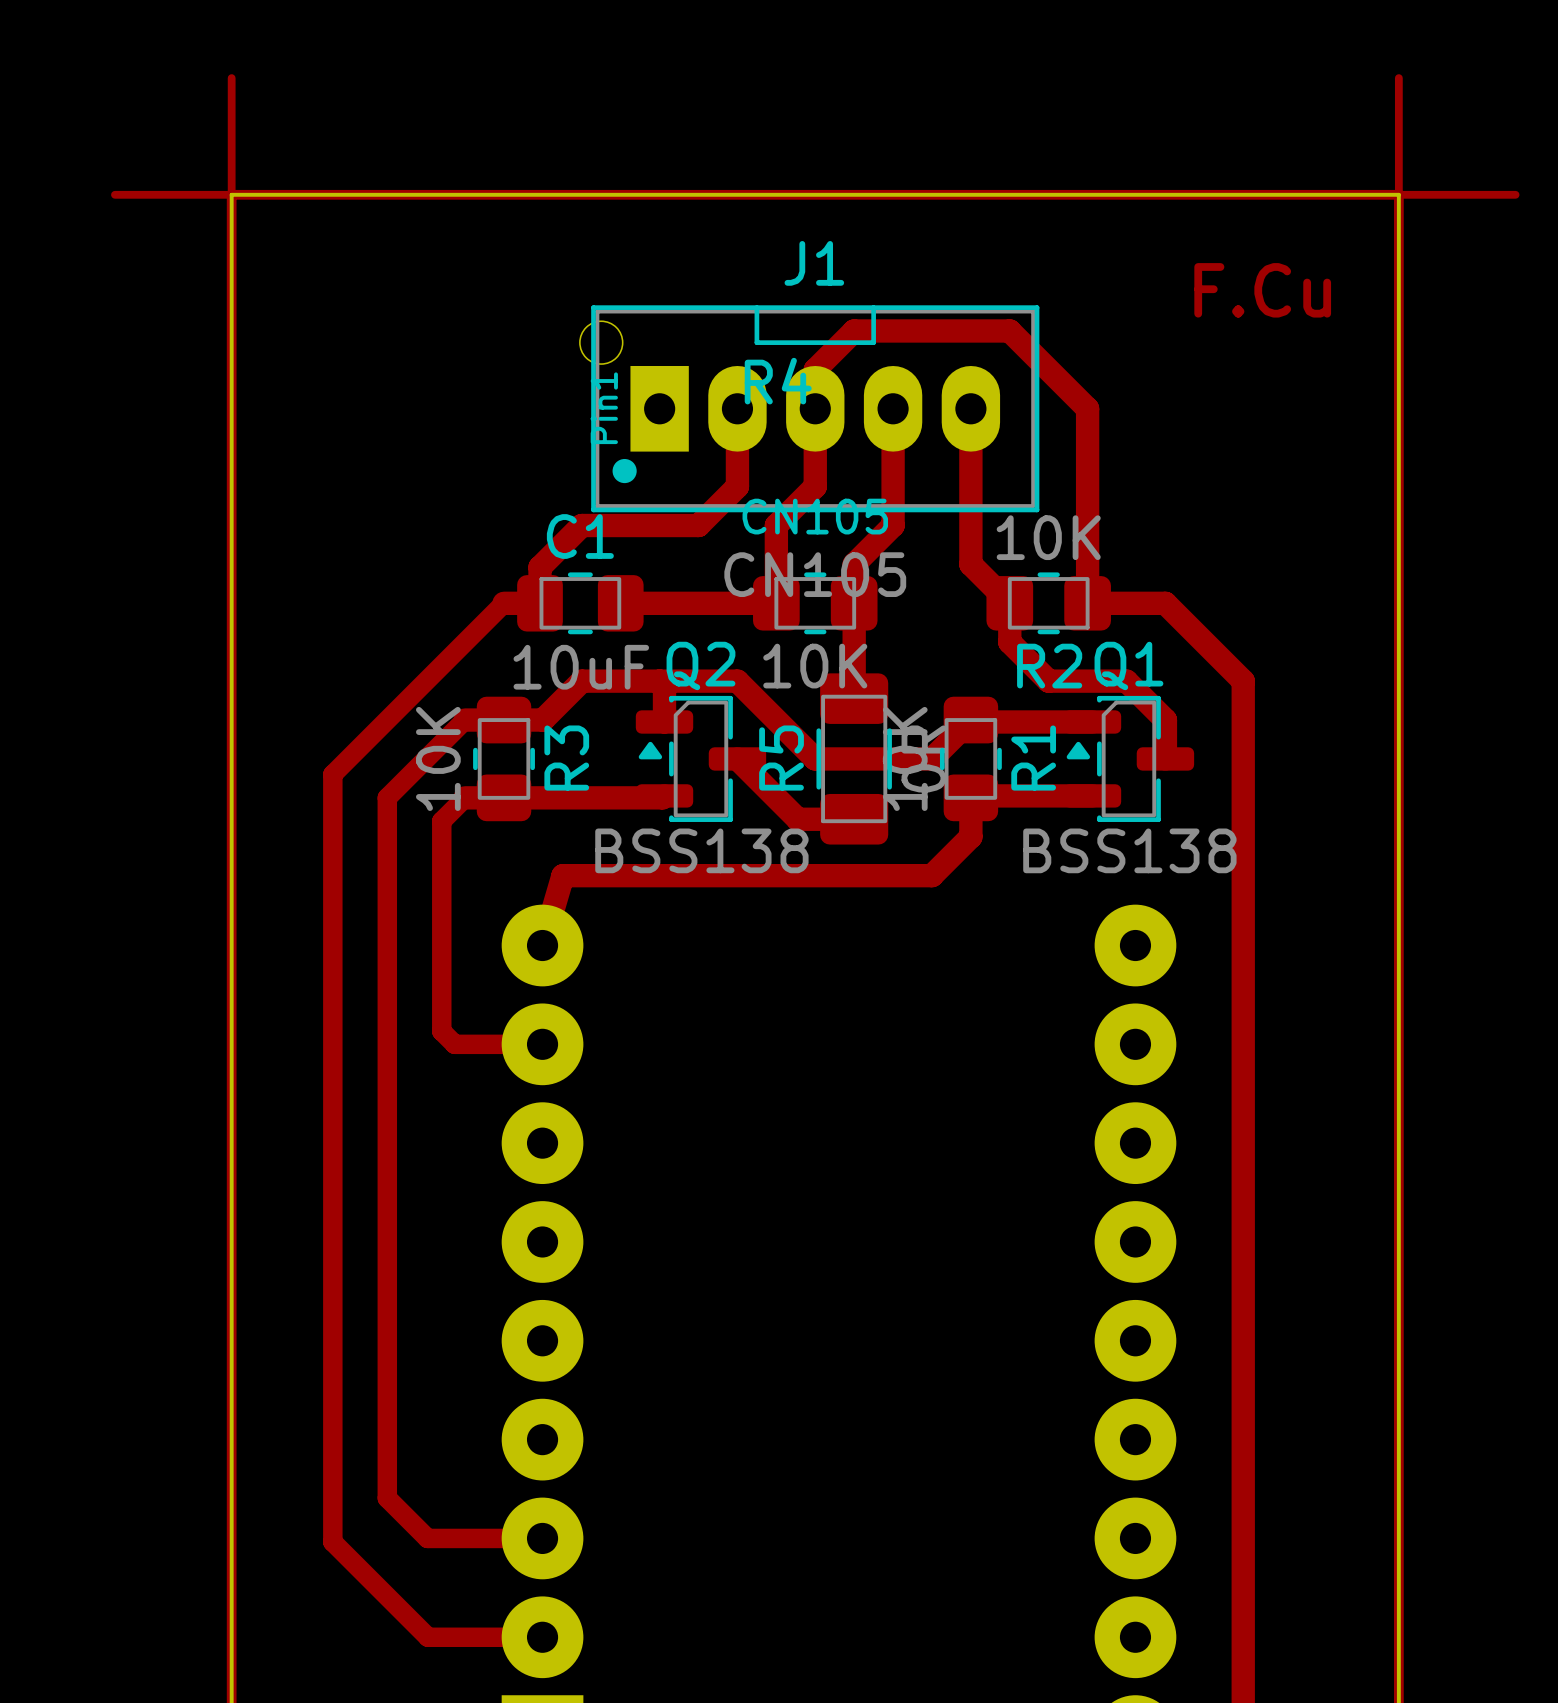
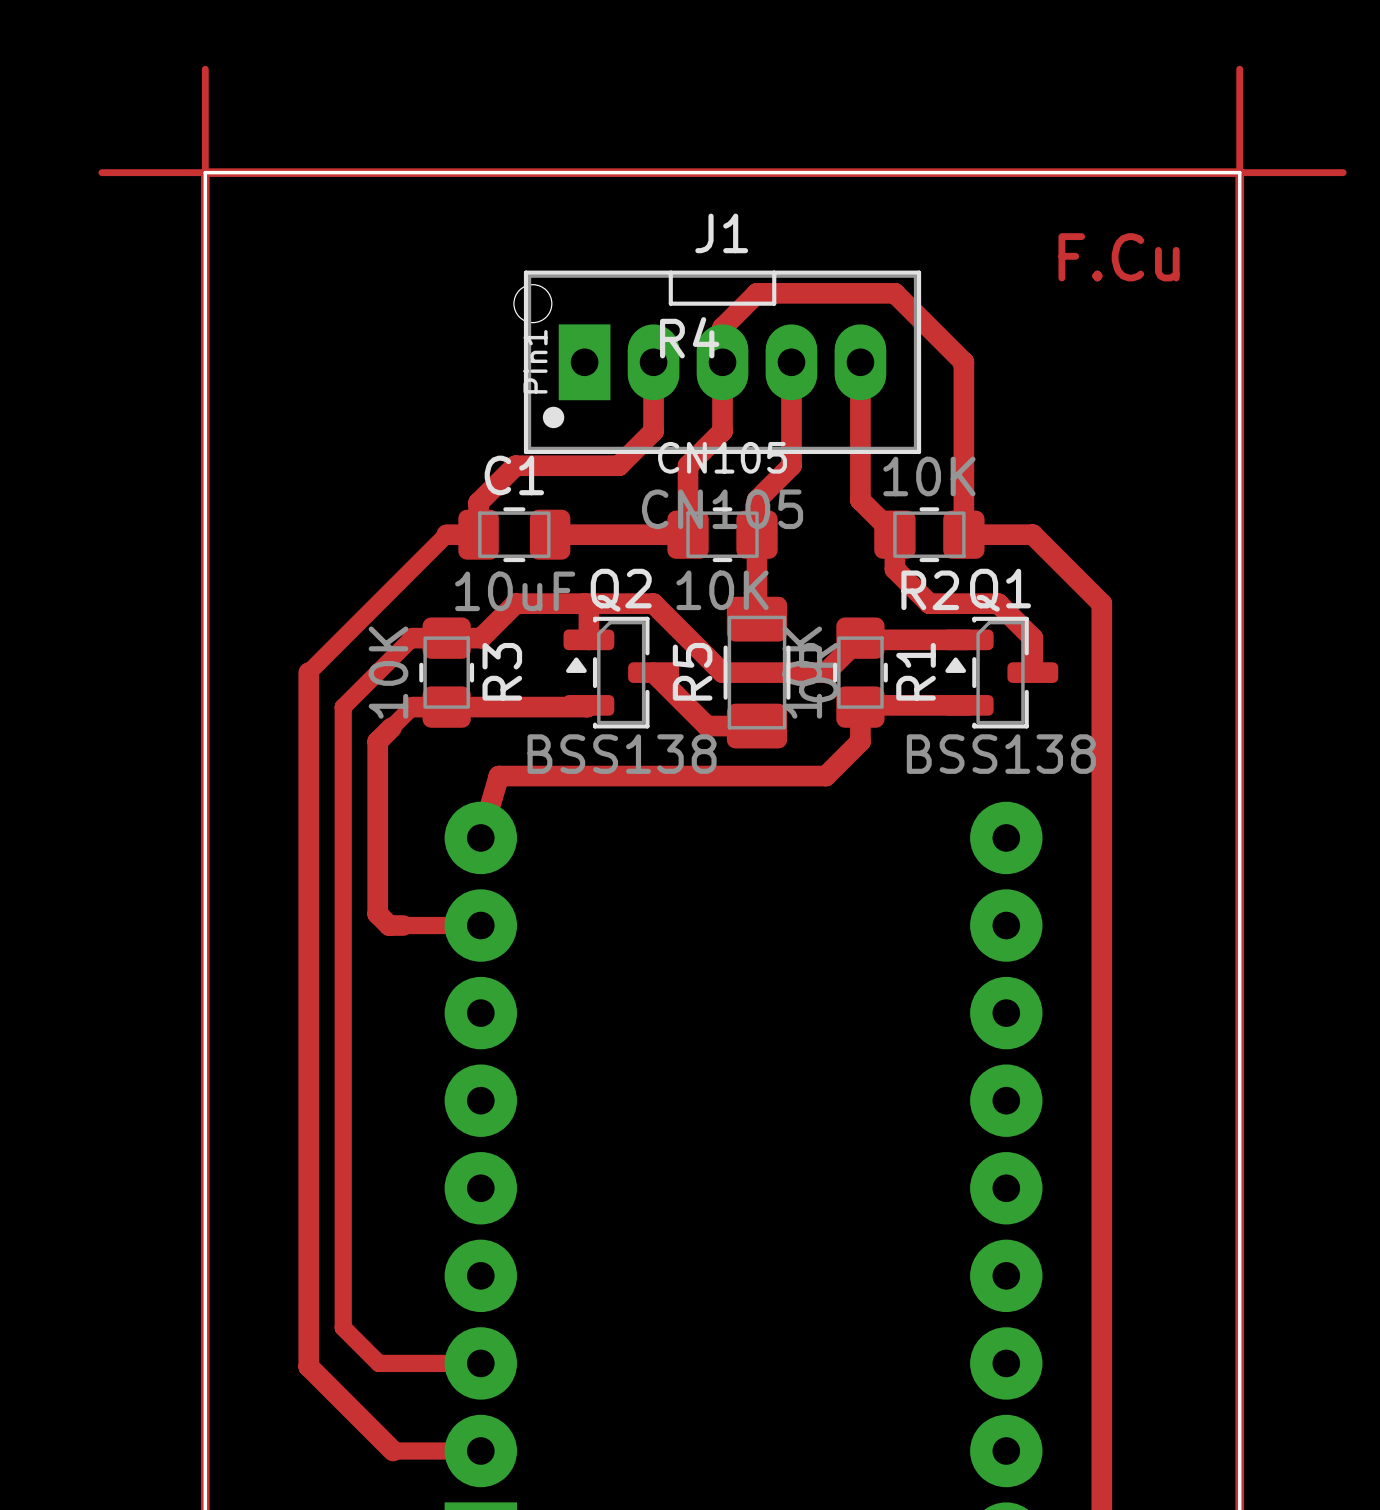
top track: (348, 758) (332, 774) (332, 1542) (428, 1637) (443, 1637) -> (308, 672) (308, 1366) (393, 1451)
top track: (441, 821) (441, 1031) (454, 1044) -> (391, 727) (377, 741) (377, 913) (389, 925) (403, 925)

